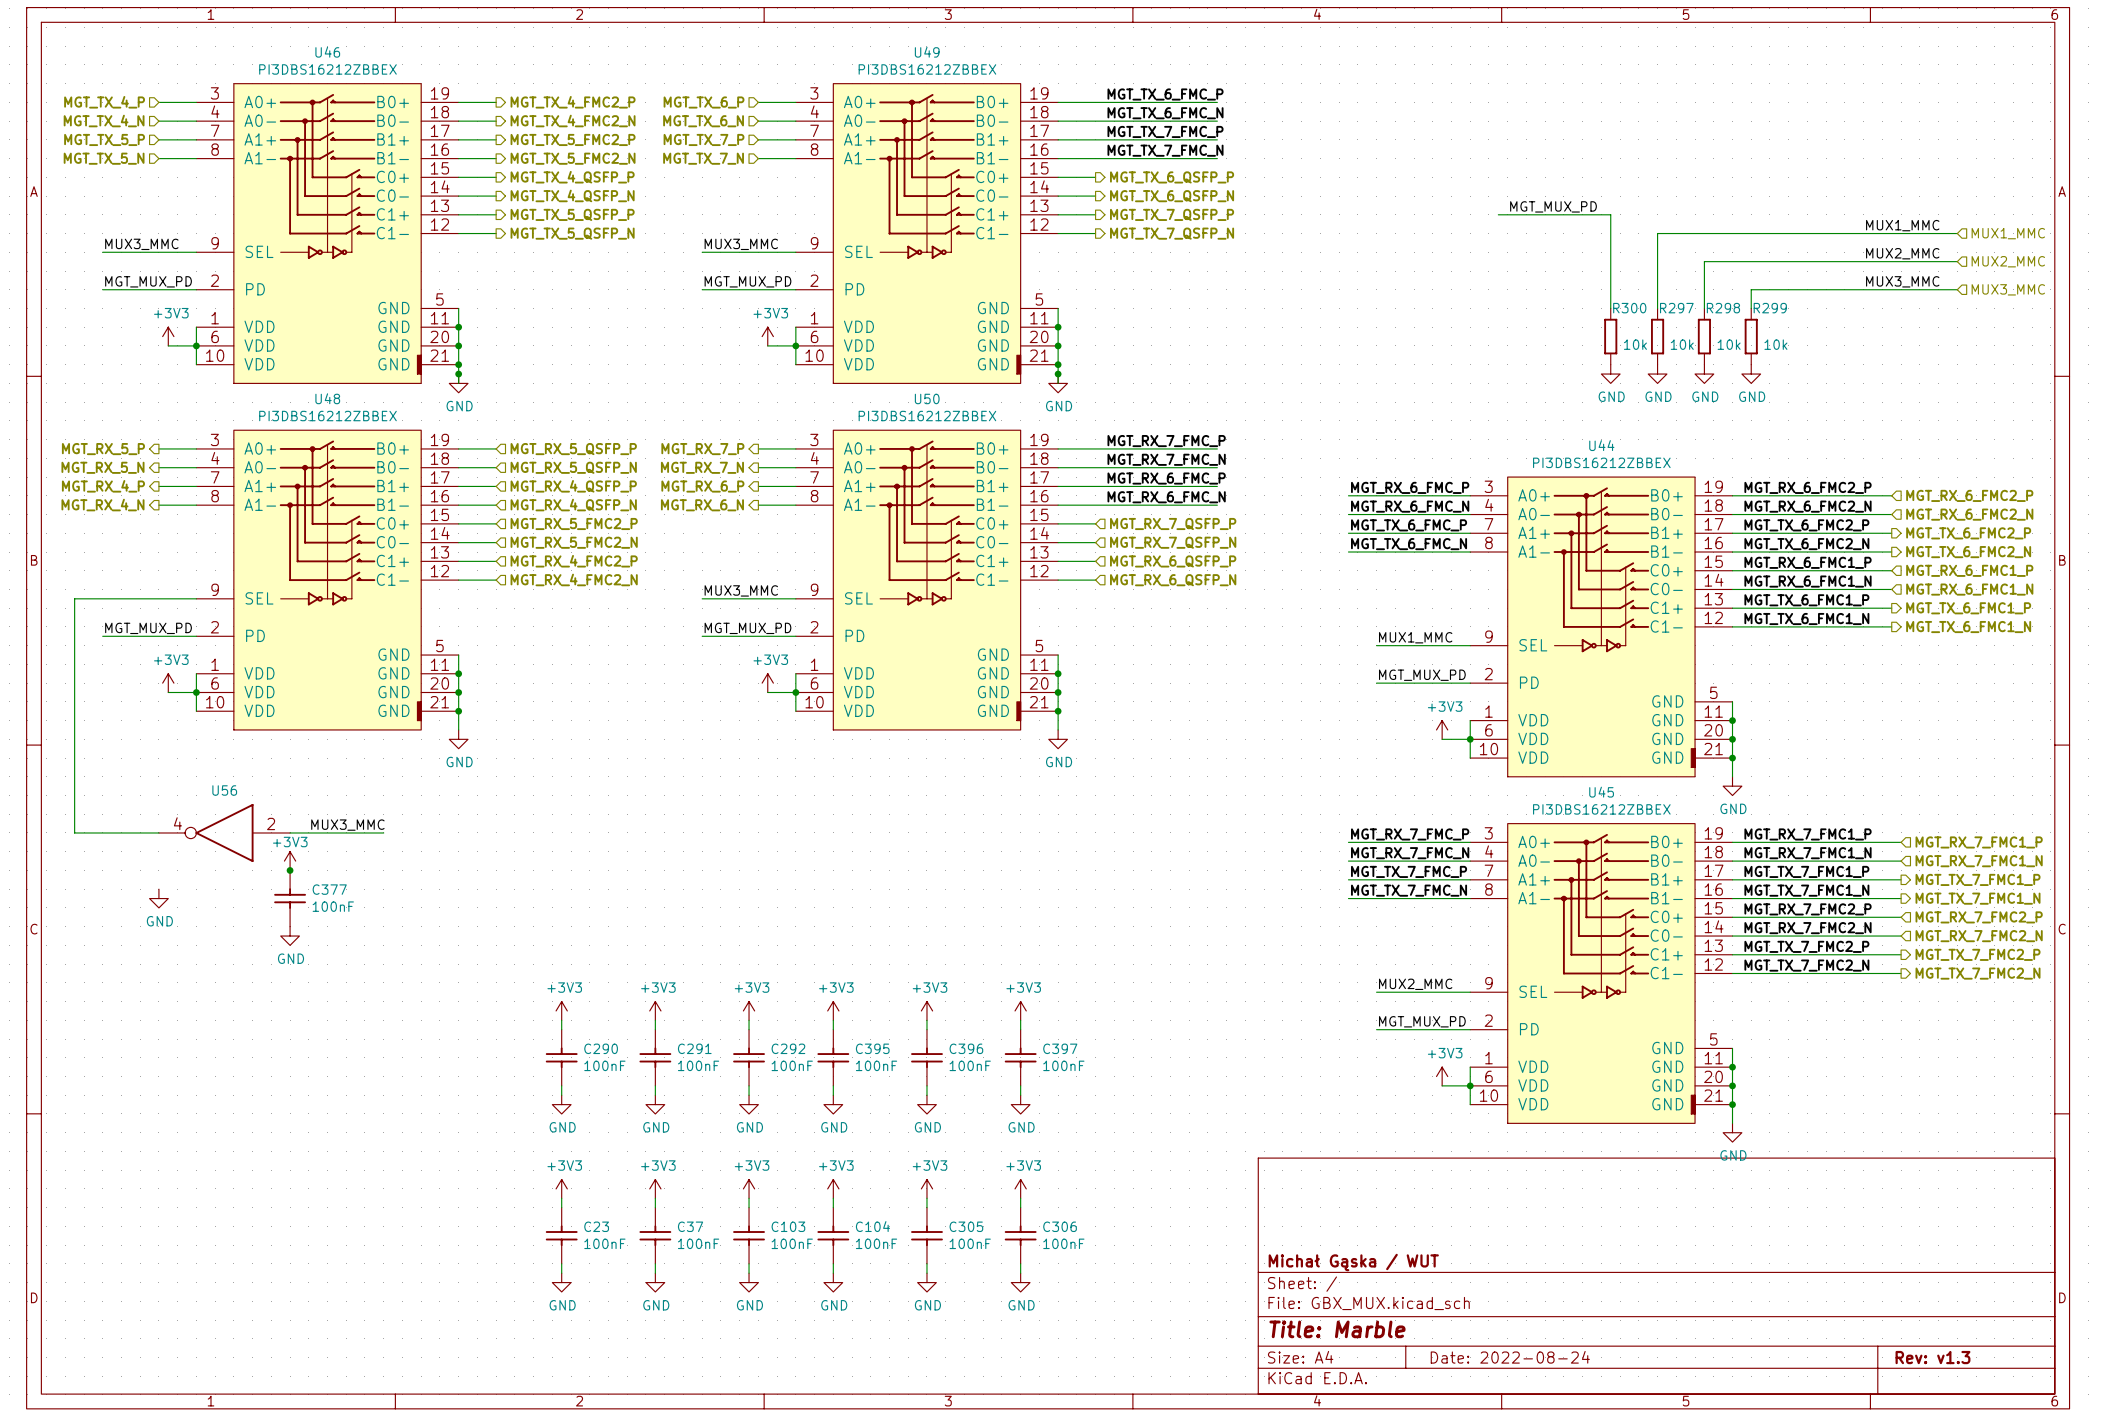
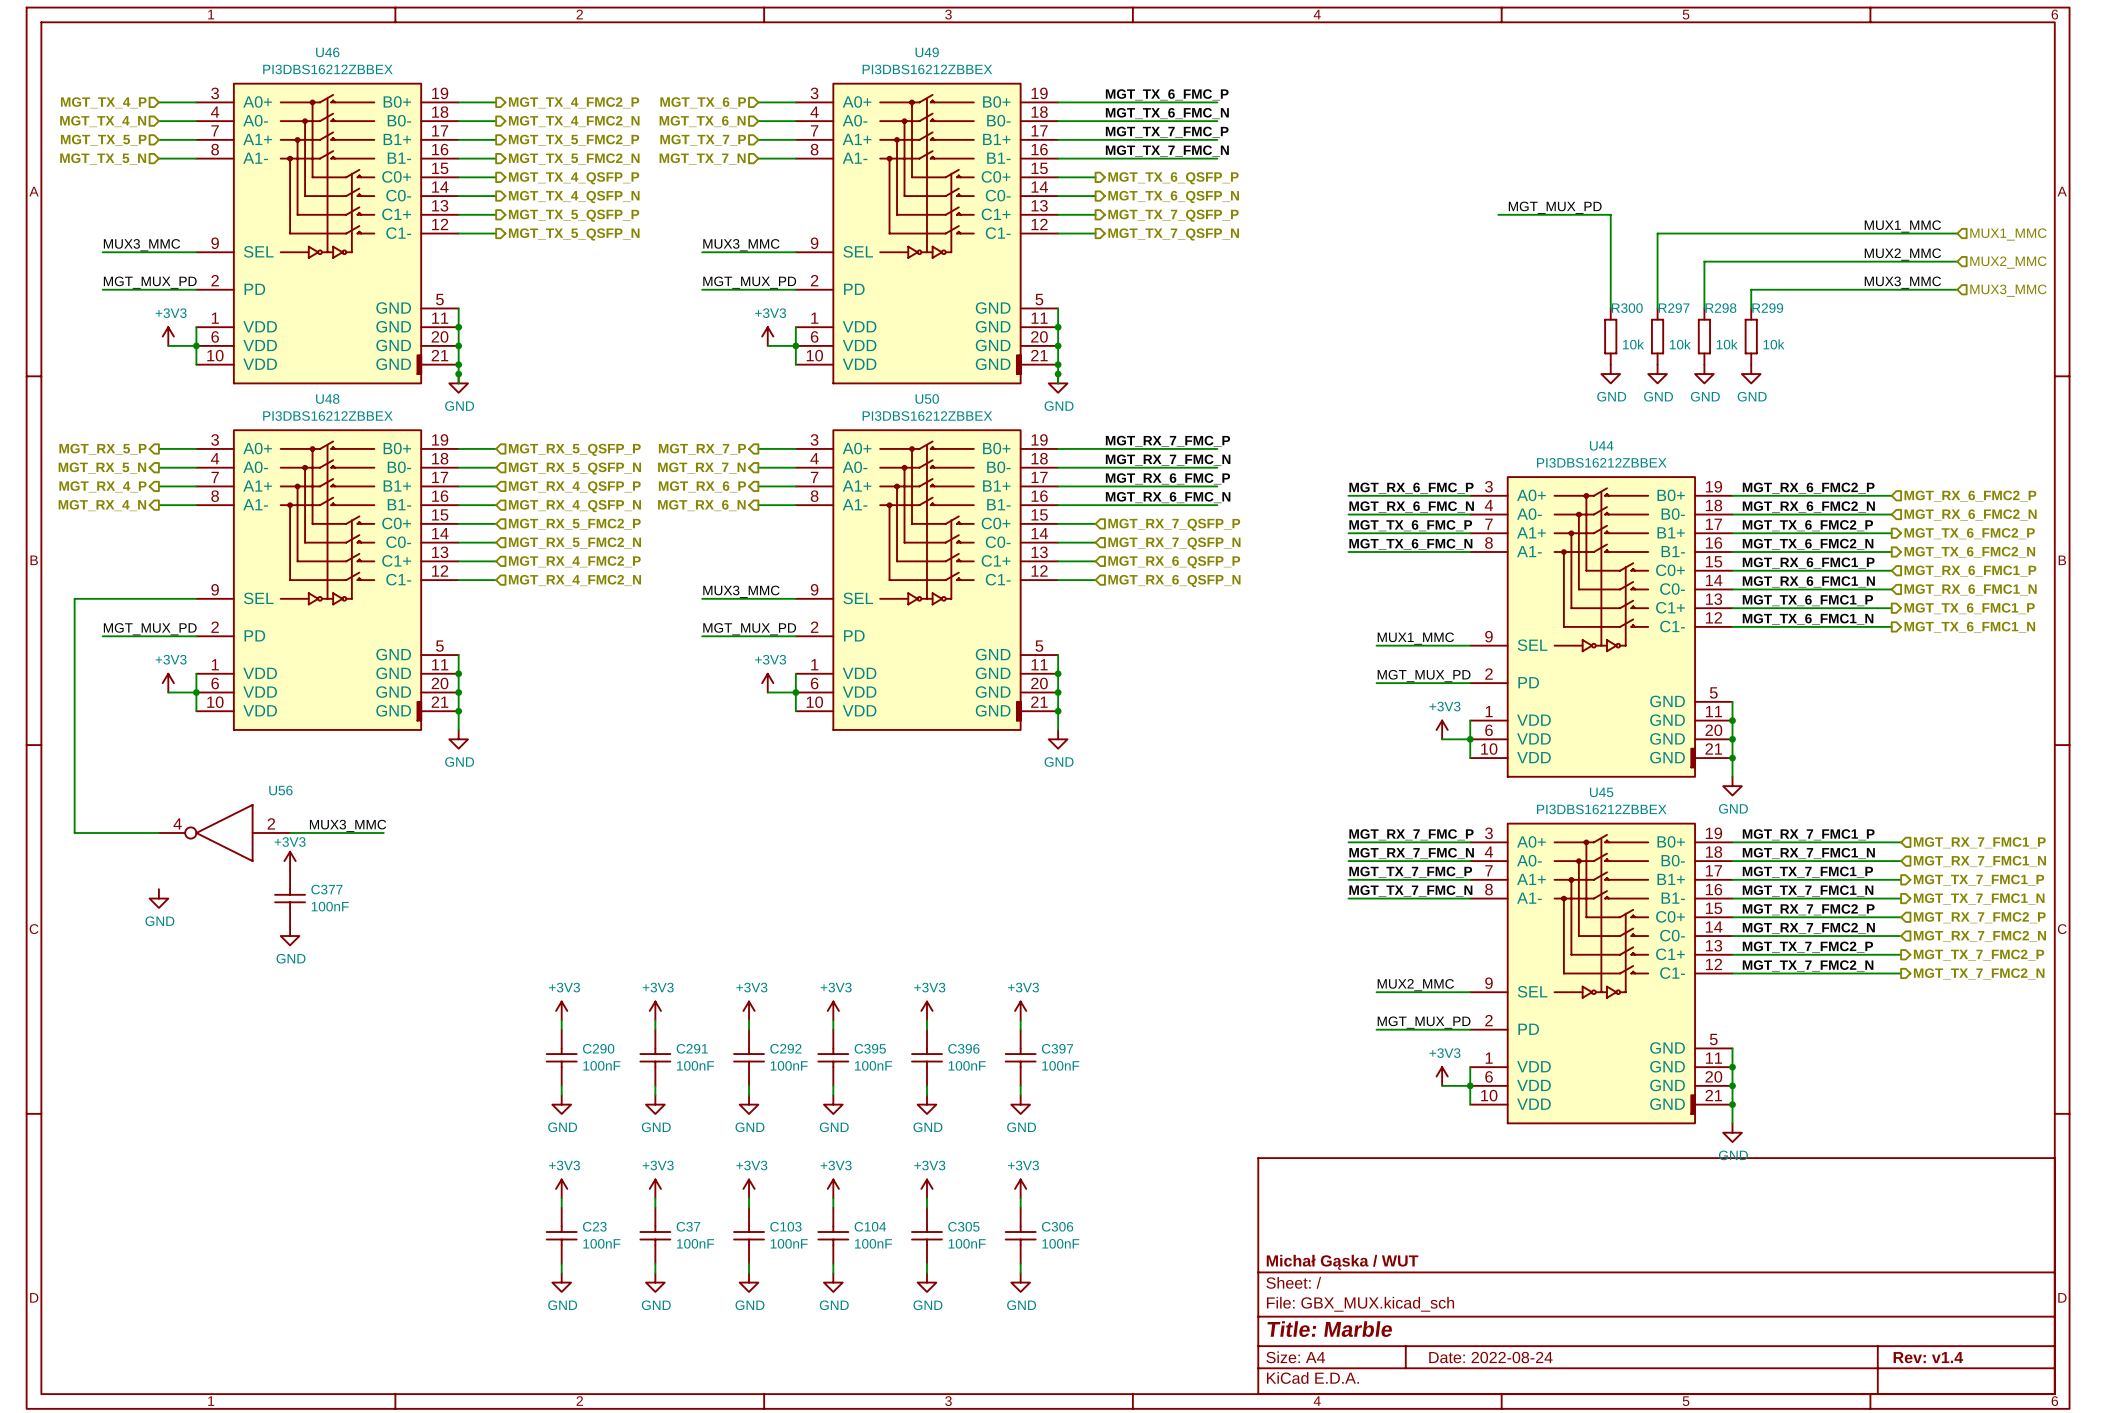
U56 name position: U56 (224, 790) -> U56 (280, 790)
junction: (290, 870) -> none
title block: Rev: v1.3 (1932, 1357) -> Rev: v1.4 (1928, 1357)

